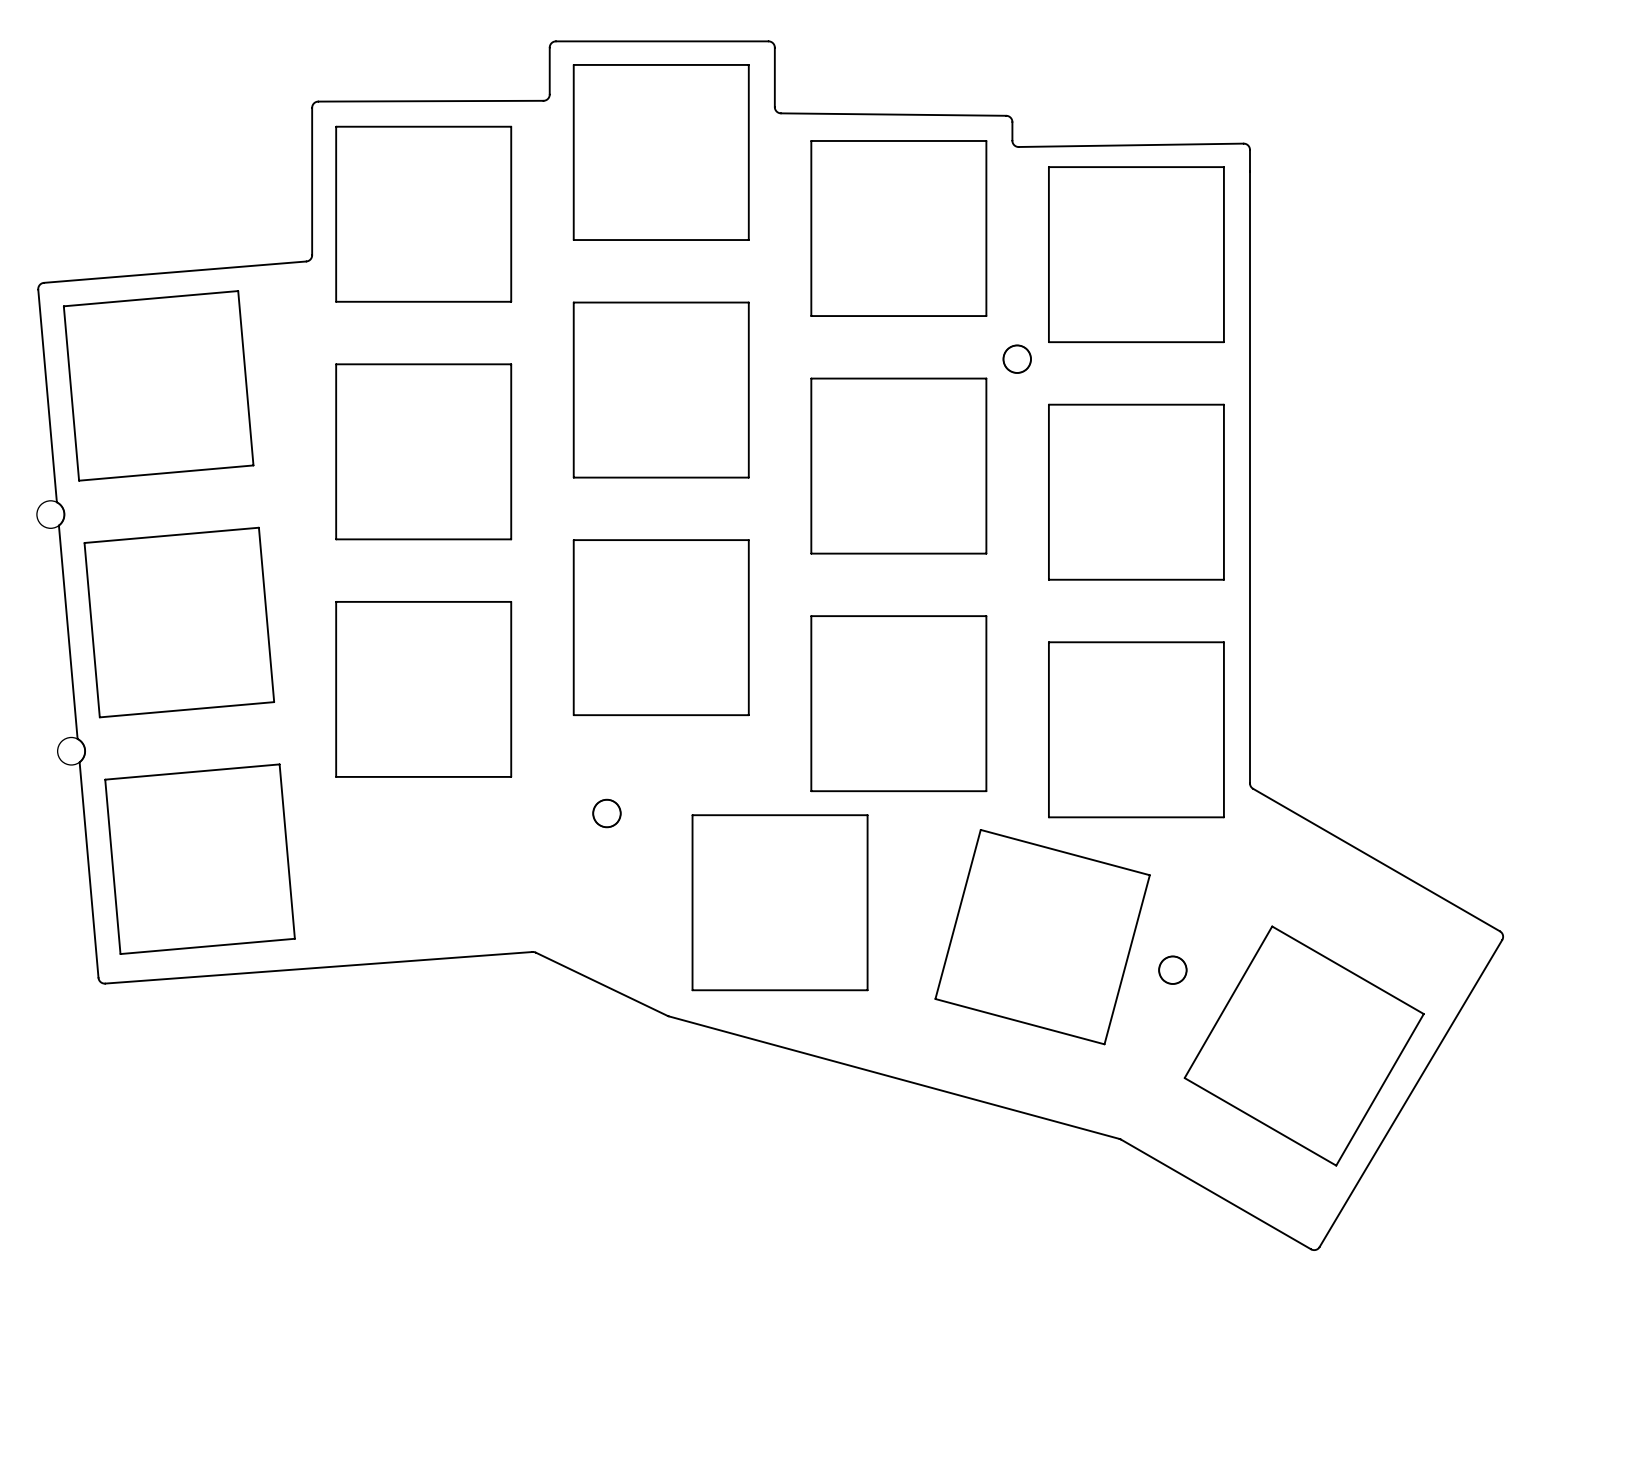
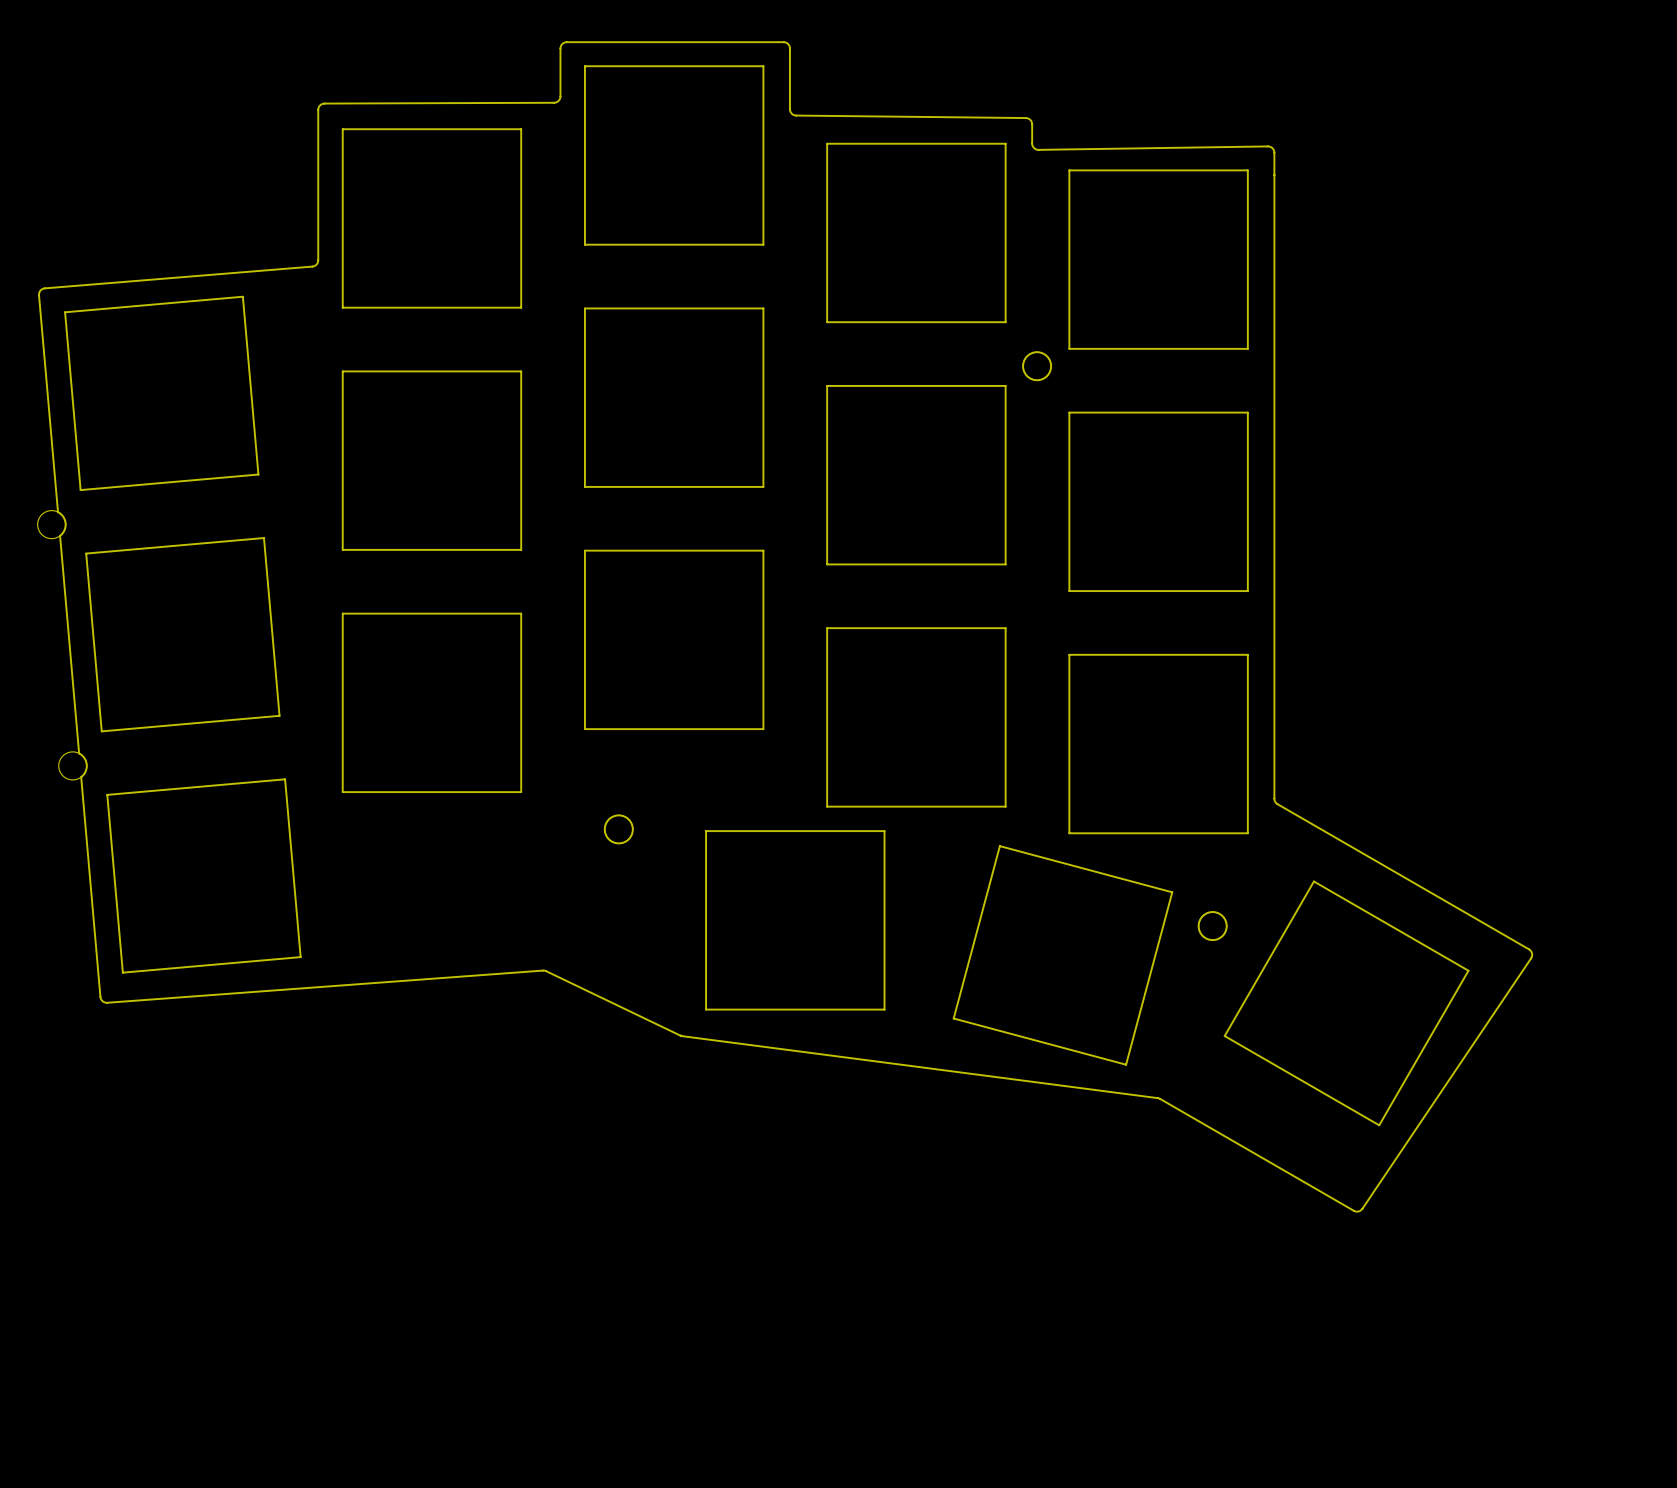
board edge: (1272, 926) (1423, 1014) (1336, 1165) (1184, 1078) (1272, 926) -> (1313, 881) (1224, 1036) (1379, 1125) (1468, 970) (1313, 881)
board edge: (1499, 931) (1502, 935) (1502, 939) (1319, 1247) (1315, 1250) (1120, 1139) (667, 1015) -> (1528, 949) (1532, 953) (1531, 958) (1362, 1208) (1357, 1211) (1158, 1098) (680, 1035)
round board edge position: (1172, 970) -> (1212, 926)

